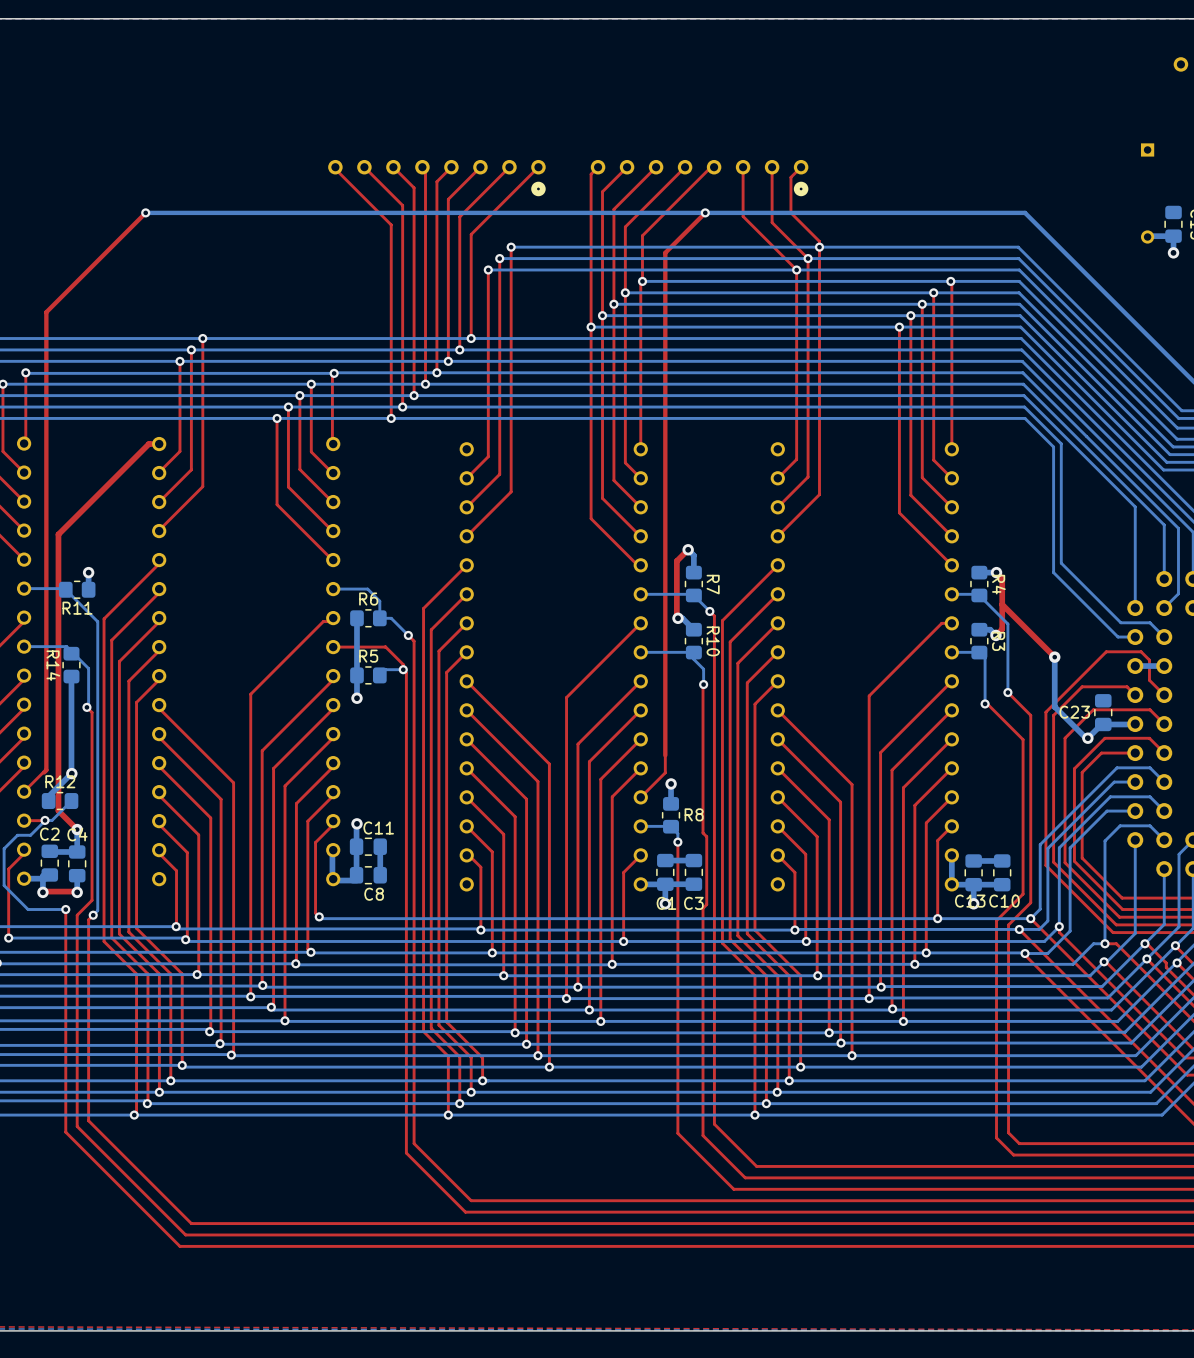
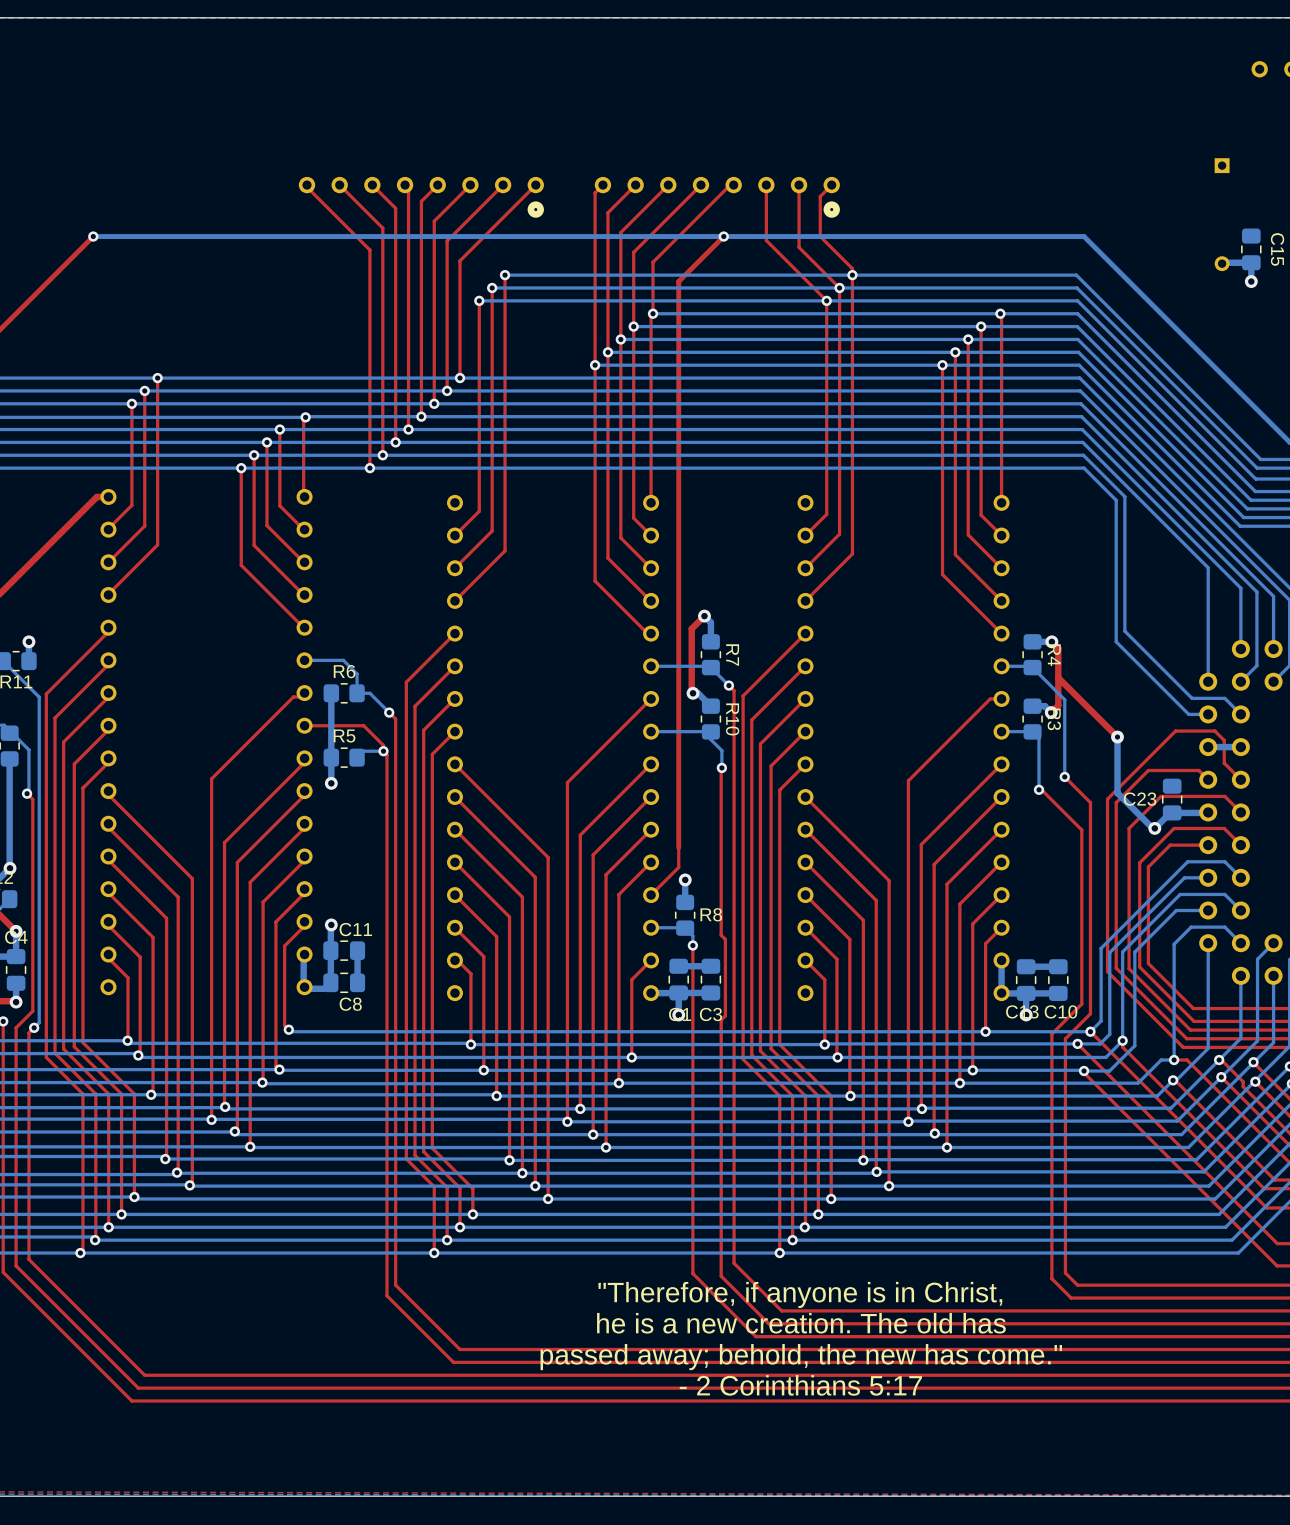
text: none -> "Therefore, if anyone is in Christ, (800, 1294)
text: none -> he is a new creation. The old has (801, 1323)
text: none -> passed away; behold, the new has come." (801, 1357)
text: none -> - 2 Corinthians 5:17 (800, 1385)

